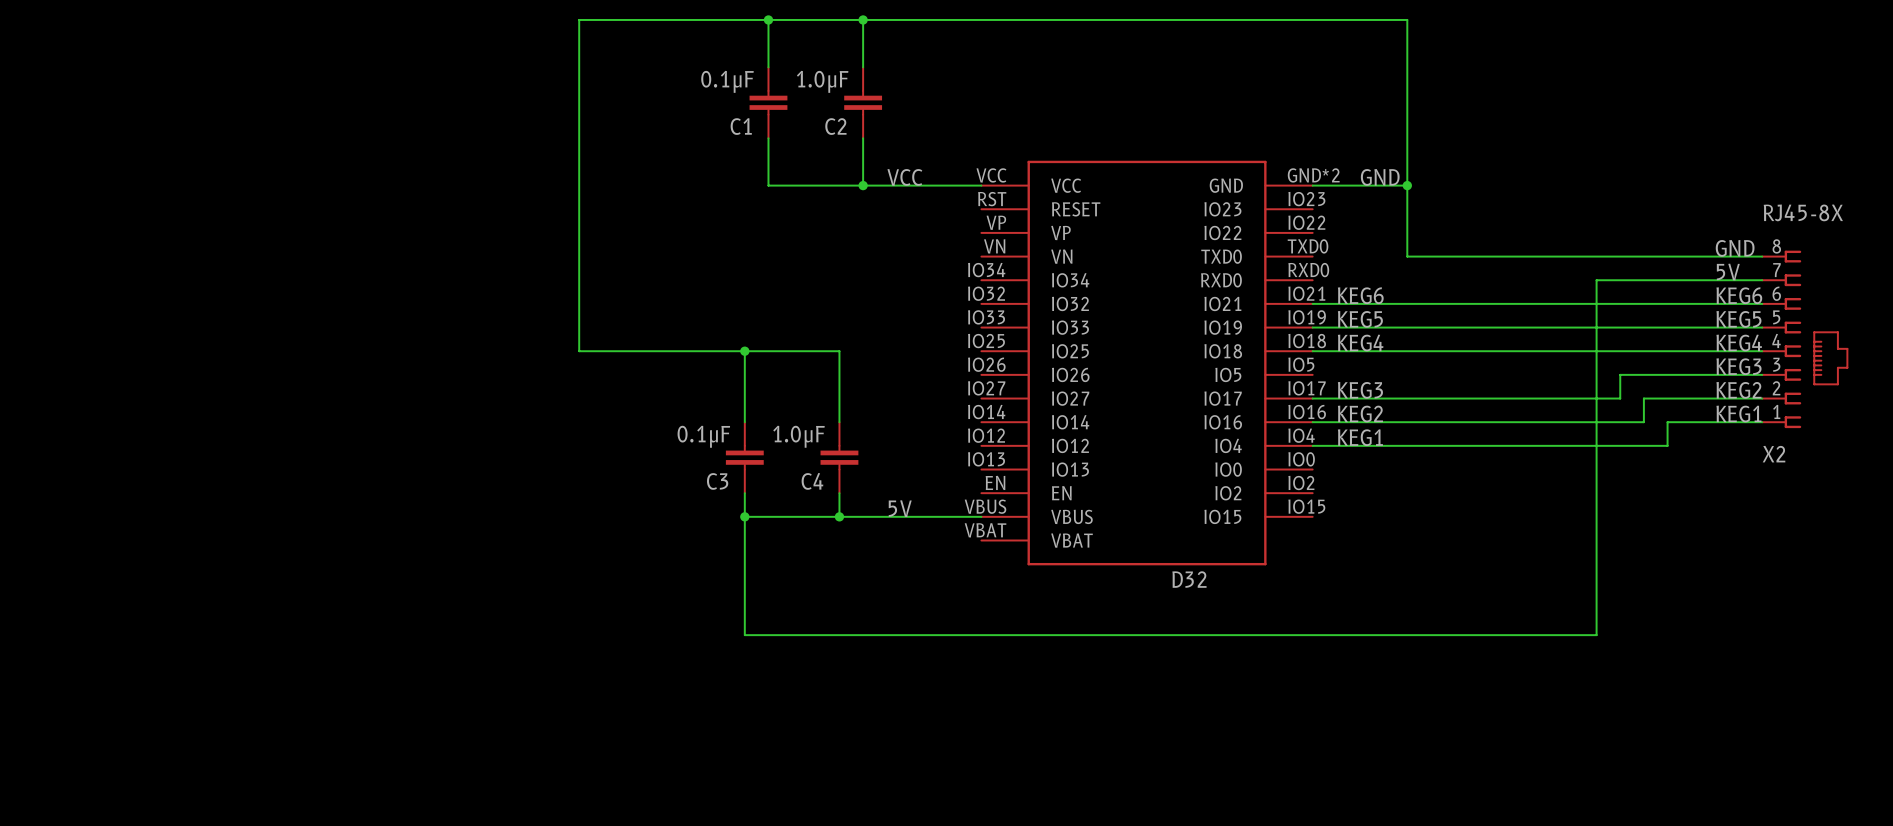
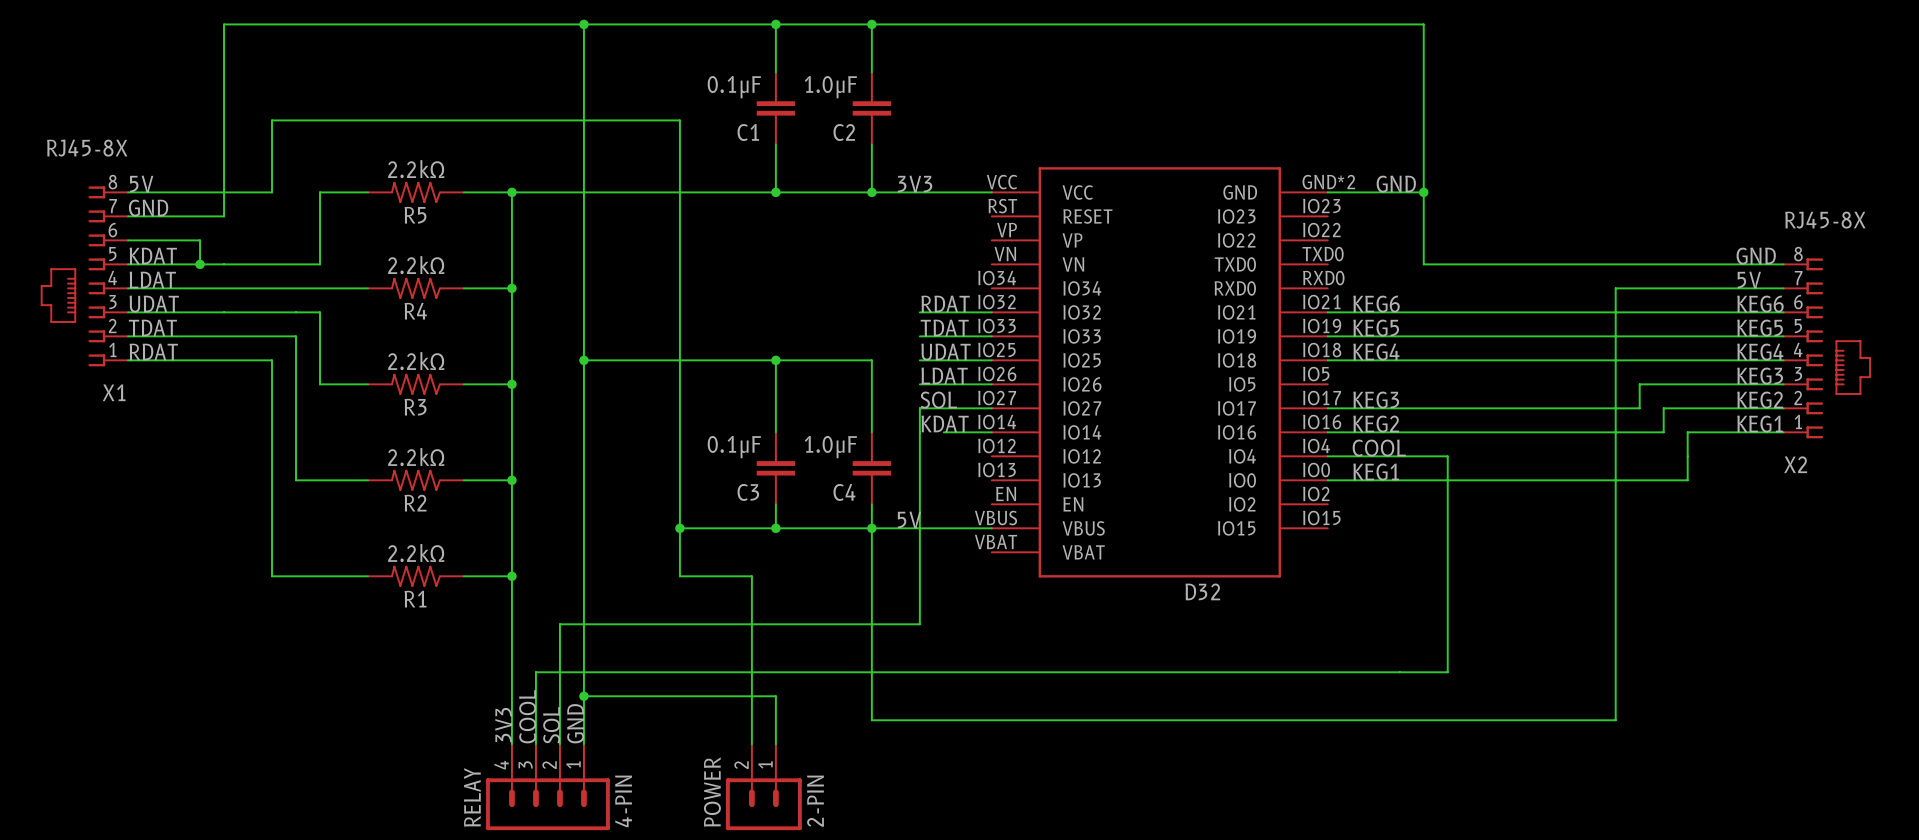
wire: none -> (583, 24) (224, 24) (224, 216) (128, 216)
junction: none -> (583, 24)
label: none -> 5V (141, 184)
label: VCC (904, 177) -> 3V3 (915, 184)
wire: none -> (367, 192) (320, 192) (320, 264) (128, 264)
R5: none -> 2.2kΩ (415, 192)
wire: none -> (463, 192) (775, 192)
wire: none -> (511, 192) (511, 744)
junction: none -> (511, 192)
junction: none -> (775, 192)
label: none -> GND (148, 208)
wire: none -> (128, 240) (200, 240) (200, 264)
label: none -> KDAT (153, 255)
junction: none -> (200, 264)
X1: none -> RJ45-8X (84, 276)
label: none -> LDAT (152, 279)
wire: none -> (128, 288) (367, 288)
R4: none -> 2.2kΩ (415, 288)
wire: none -> (463, 288) (511, 288)
junction: none -> (511, 288)
label: none -> UDAT (154, 304)
label: none -> RDAT (945, 303)
wire: none -> (128, 312) (320, 312) (320, 384) (367, 384)
wire: none -> (919, 312) (991, 312)
label: none -> TDAT (152, 327)
label: none -> TDAT (944, 327)
wire: none -> (128, 336) (296, 336) (296, 480) (367, 480)
wire: none -> (919, 336) (991, 336)
label: none -> RDAT (153, 351)
label: none -> UDAT (946, 352)
wire: none -> (128, 360) (272, 360) (272, 576) (367, 576)
wire: none -> (583, 360) (583, 744)
junction: none -> (583, 360)
wire: (744, 351) (744, 422) -> (775, 360) (775, 432)
junction position: (744, 351) -> (775, 360)
wire: (839, 351) (839, 422) -> (847, 360) (871, 360) (871, 432)
wire: none -> (919, 360) (991, 360)
label: none -> LDAT (944, 375)
R3: none -> 2.2kΩ (415, 384)
wire: none -> (463, 384) (511, 384)
junction: none -> (511, 384)
wire: none -> (919, 384) (991, 384)
label: none -> SOL (938, 400)
wire: none -> (991, 408) (919, 408) (919, 624) (559, 624) (559, 744)
label: none -> KDAT (945, 423)
wire: none -> (943, 432) (991, 432)
label: KEG1 (1360, 437) -> COOL (1379, 448)
wire: (1430, 445) (1667, 445) -> (1327, 480) (1687, 480) (1687, 456)
wire: none -> (1447, 456) (1447, 672) (535, 672) (535, 744)
C3 position: (744, 457) -> (775, 468)
C4 position: (839, 457) -> (871, 468)
label: none -> KEG1 (1376, 472)
R2: none -> 2.2kΩ (415, 480)
wire: none -> (463, 480) (511, 480)
junction: none -> (511, 480)
wire: (744, 493) (744, 564) -> (128, 192) (272, 192) (272, 120) (679, 120) (679, 576) (751, 576)
wire: (839, 493) (839, 516) -> (775, 504) (775, 528)
wire: none -> (679, 528) (751, 528)
junction: none -> (679, 528)
junction position: (744, 516) -> (775, 528)
junction position: (839, 516) -> (871, 528)
R1: none -> 2.2kΩ (415, 576)
wire: none -> (463, 576) (511, 576)
junction: none -> (511, 576)
wire: (744, 635) (1596, 635) -> (871, 504) (871, 720) (1615, 720) (1615, 648)
wire: none -> (751, 648) (751, 744)
wire: none -> (583, 696) (775, 696) (775, 744)
junction: none -> (583, 696)
label: none -> COOL (527, 716)
label: none -> GND (575, 723)
label: none -> 3V3 (503, 725)
label: none -> SOL (551, 725)
RELAY: none -> 4-PIN (547, 787)
POWER: none -> 2-PIN (763, 787)

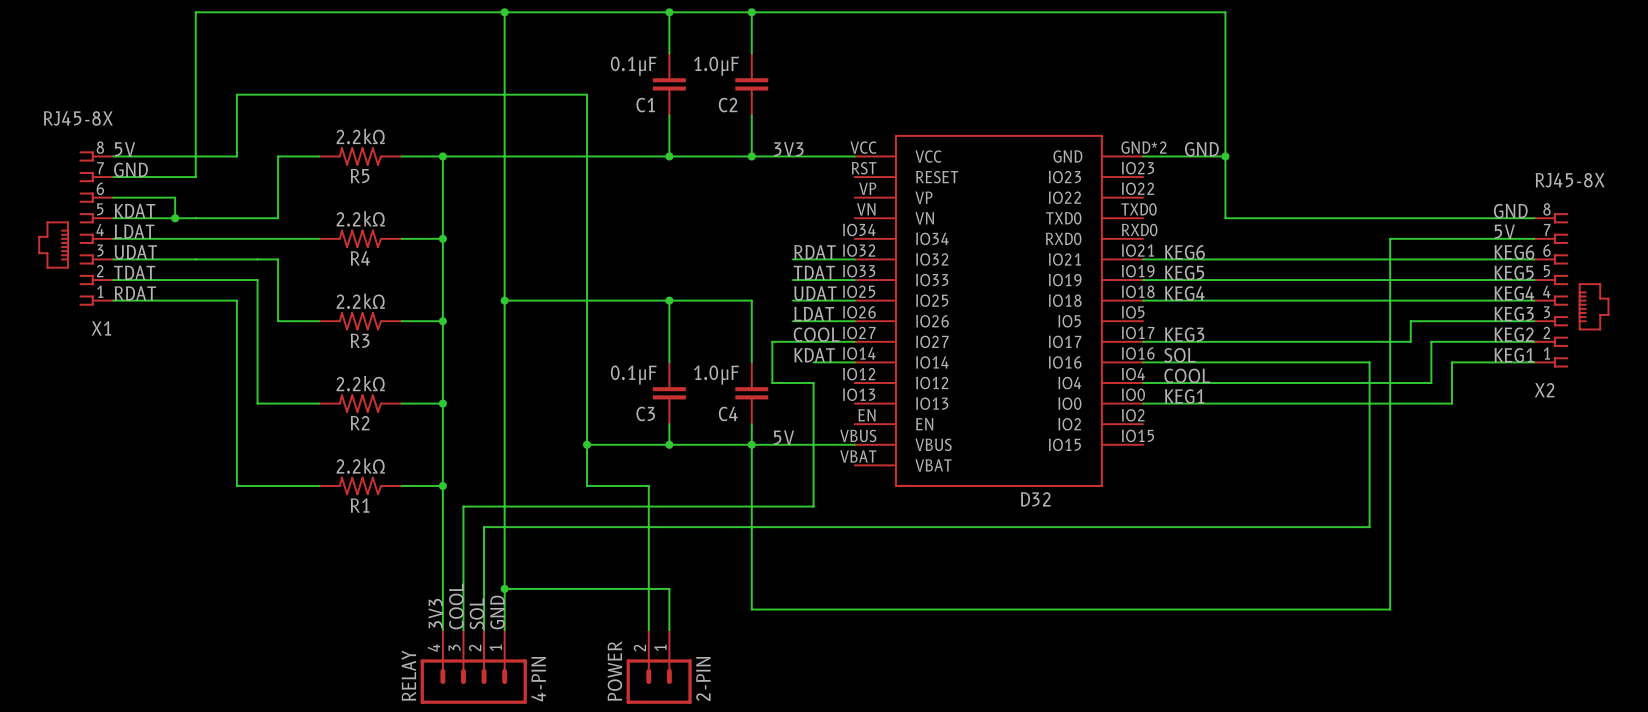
label: SOL (938, 400) -> COOL (816, 334)
wire: (919, 408) (919, 624) -> (792, 341) (772, 341) (772, 382) (813, 382) (813, 506) (463, 506) (463, 568)
label: KEG2 (1376, 424) -> SOL (1179, 355)
wire: (1591, 432) (1663, 432) -> (1246, 382) (1431, 382) (1431, 362)
wire: none -> (1369, 362) (1369, 527) (792, 527)
wire: (1447, 456) (1447, 672) (535, 672) -> none

